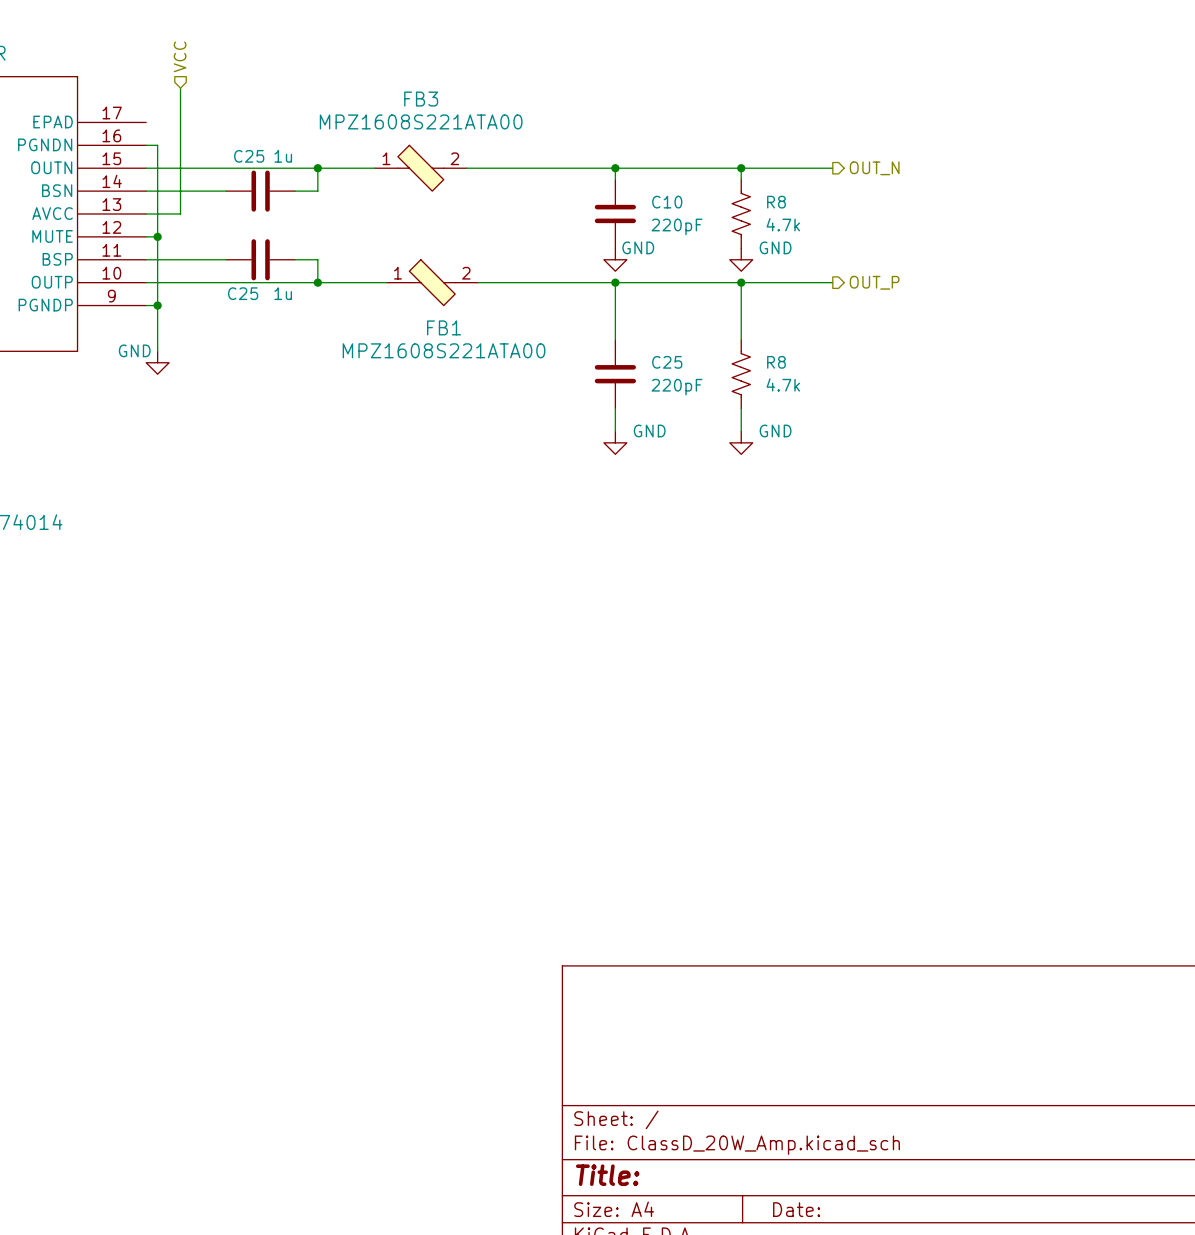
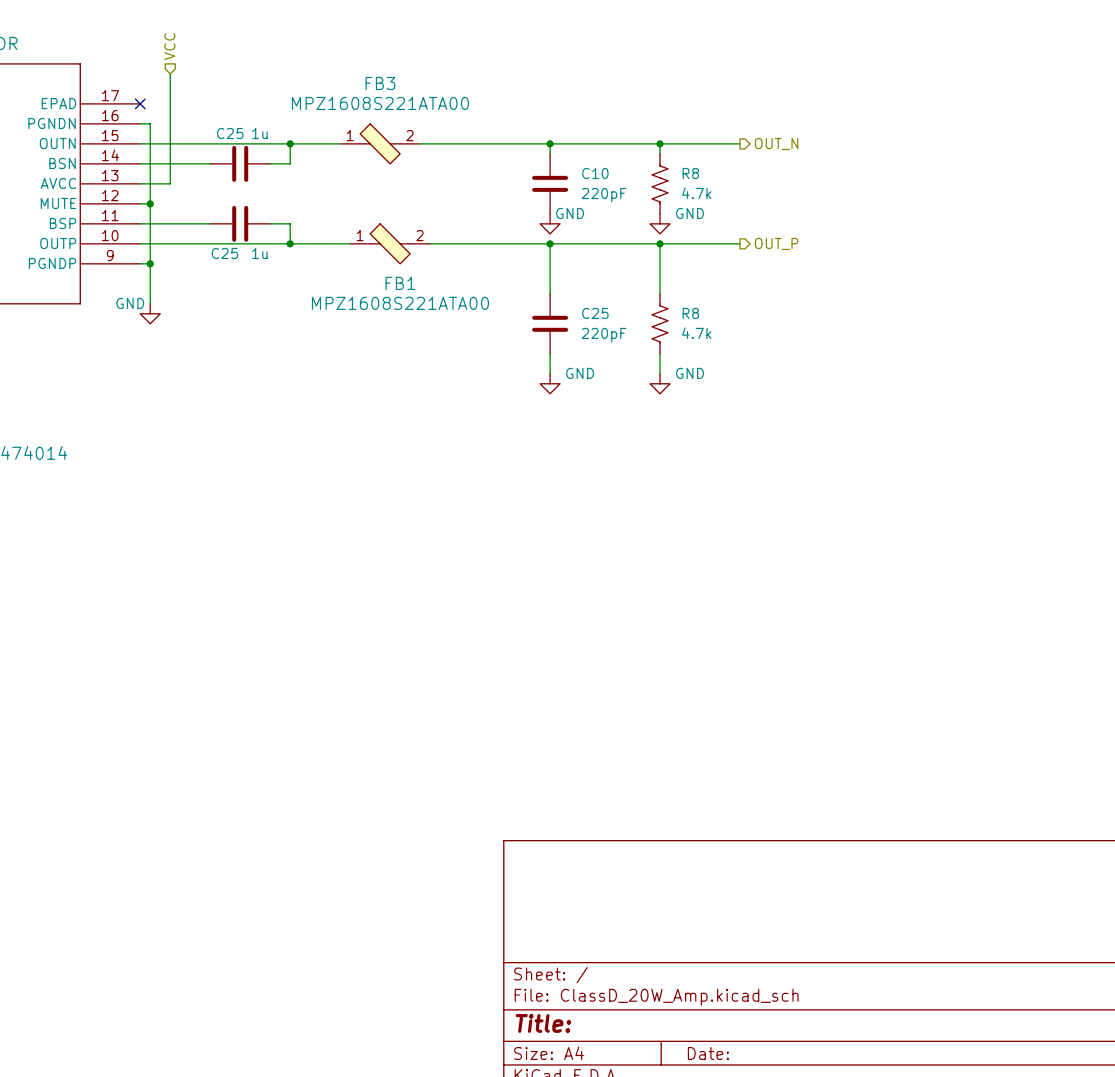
no-connect mark: none -> (140, 103)

